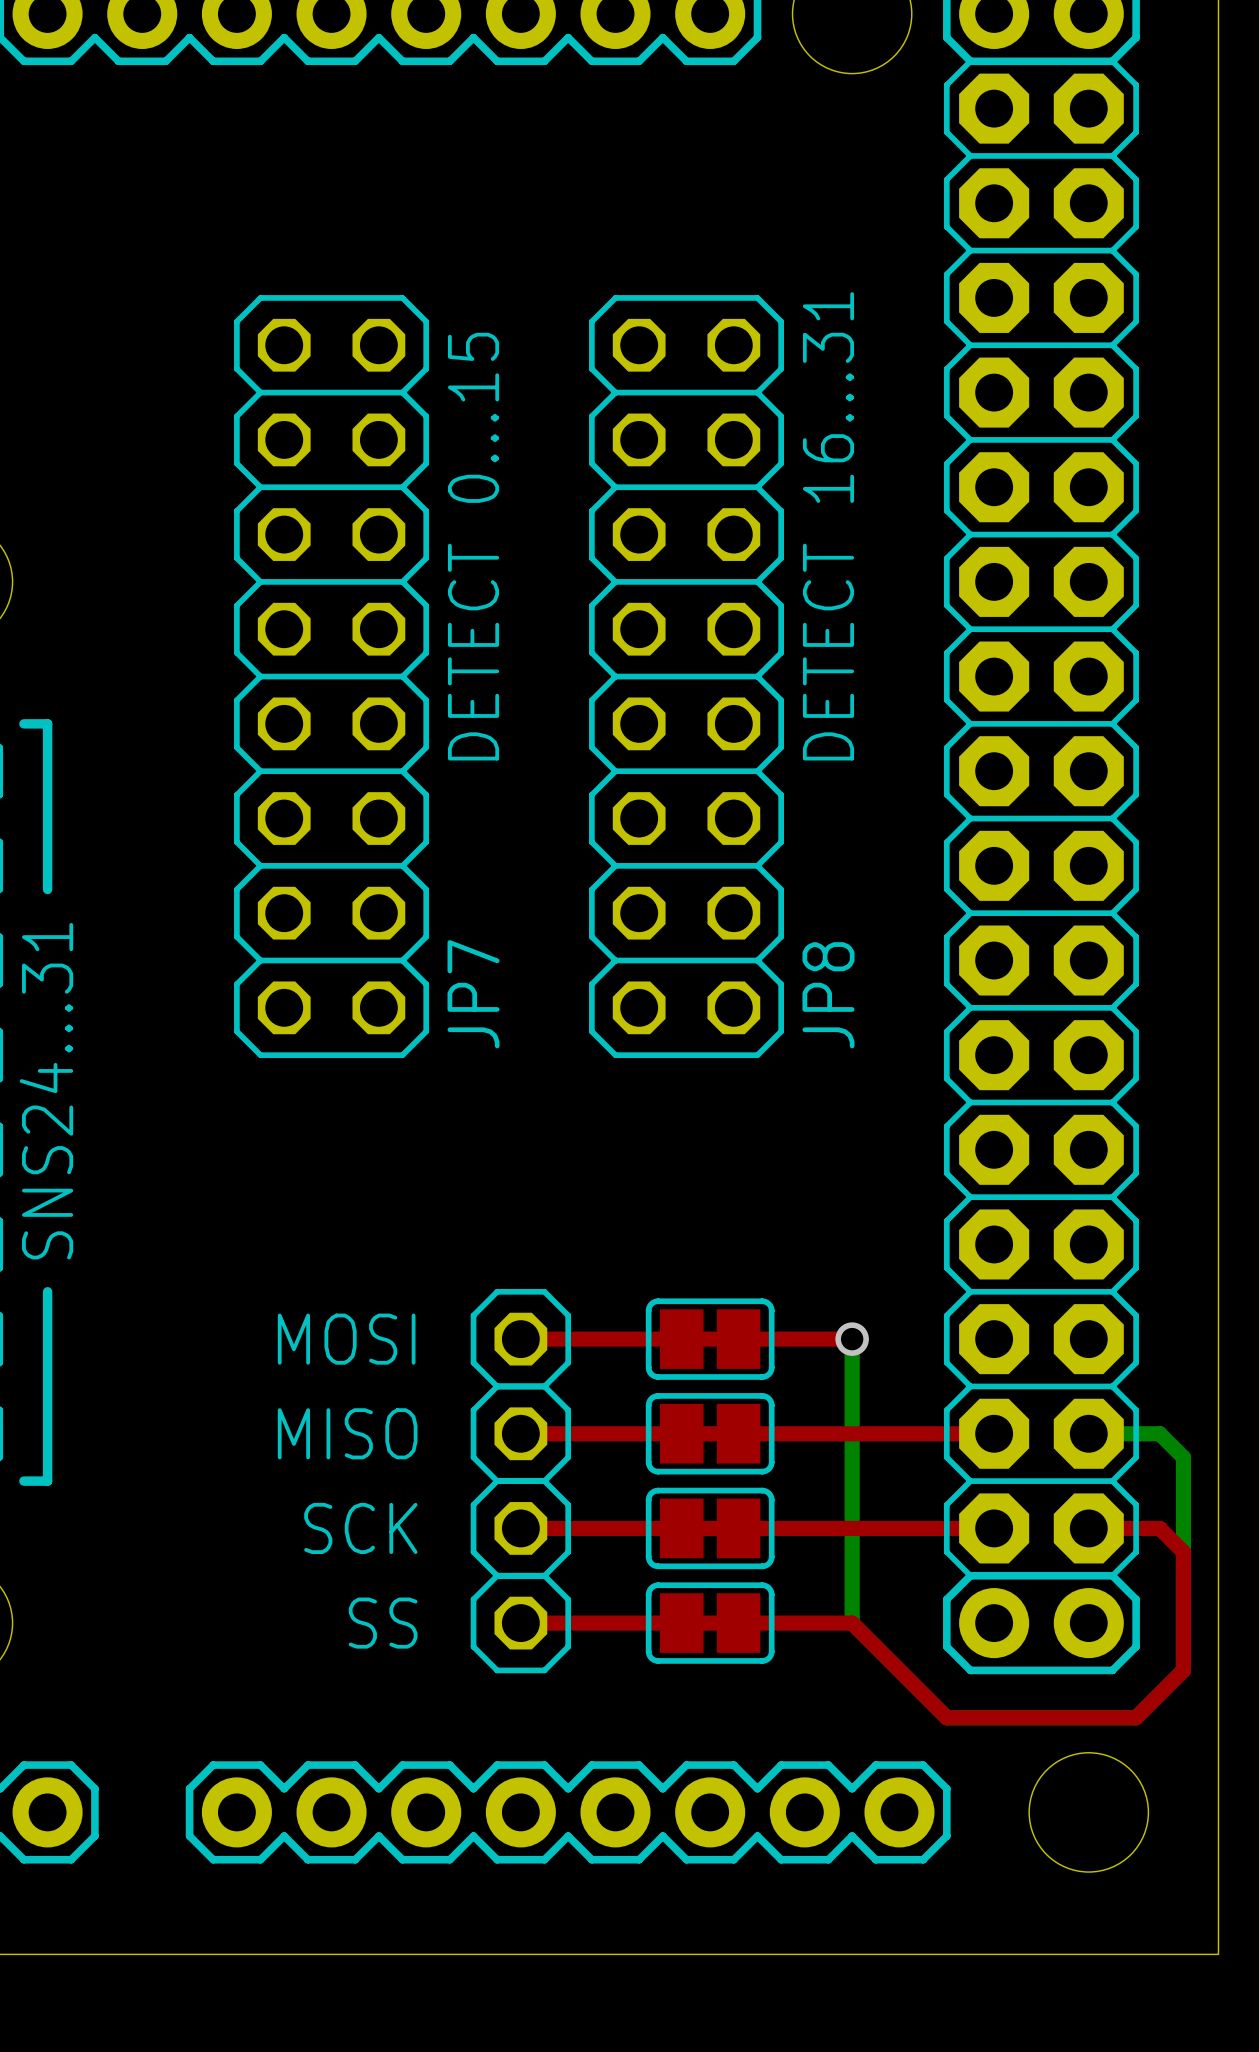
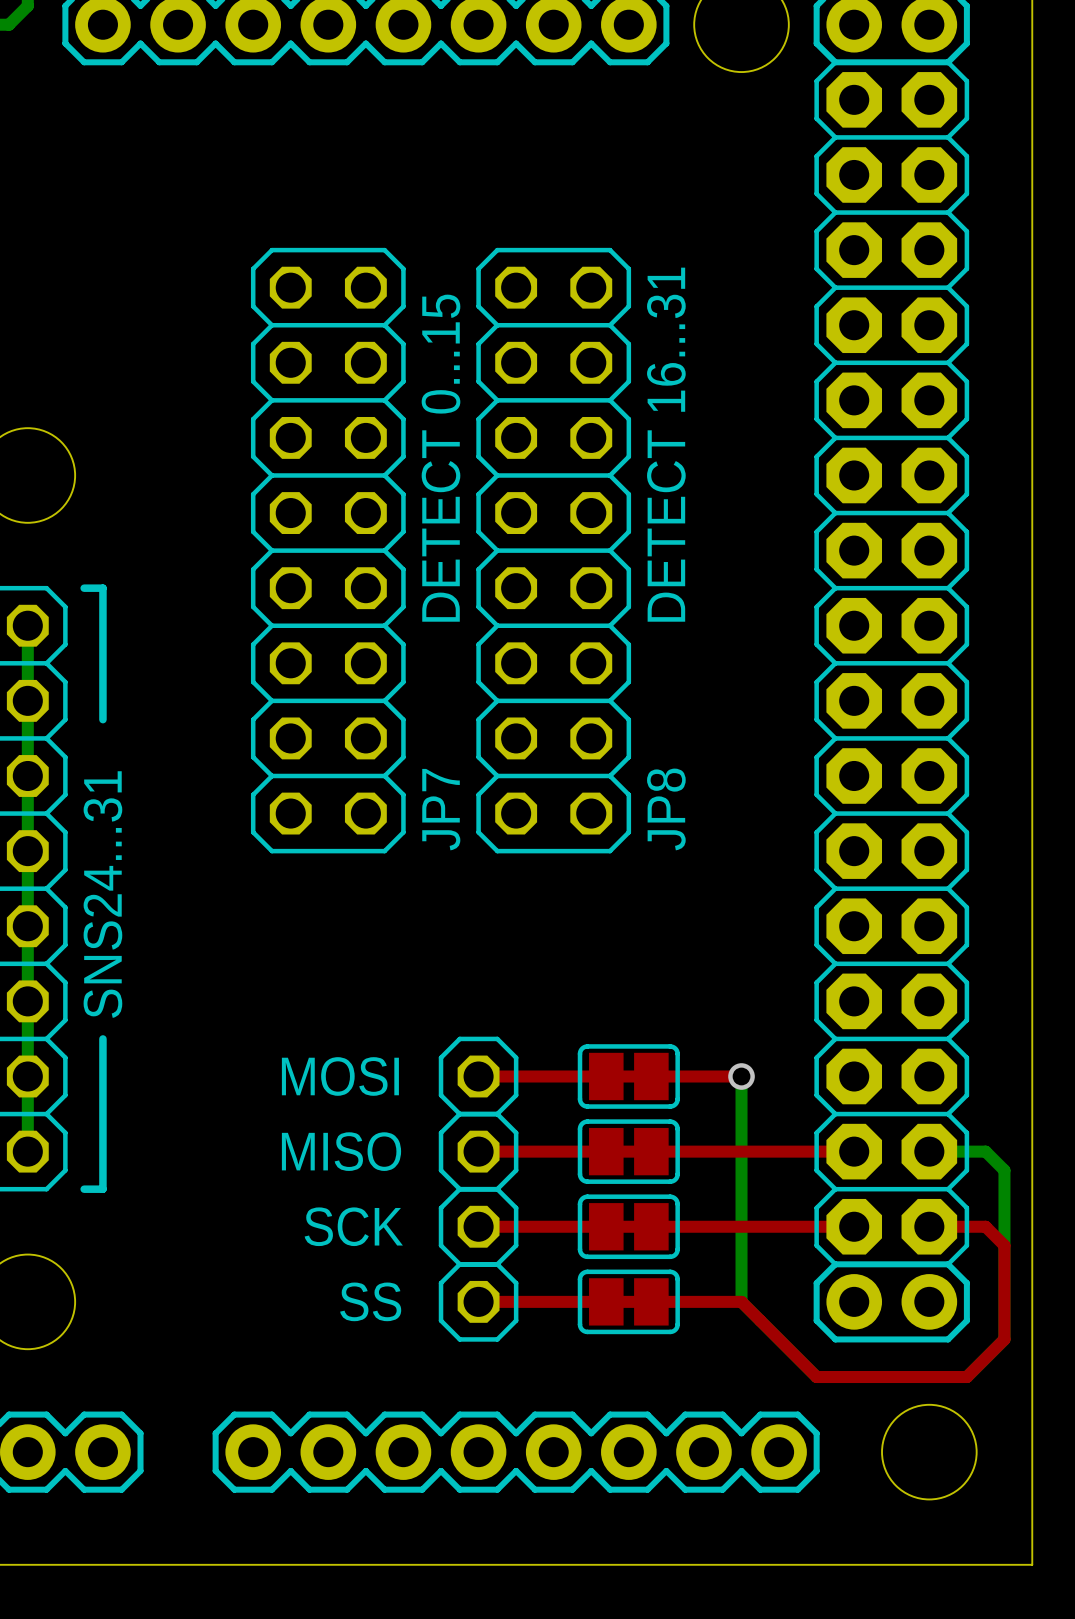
JP8 position: (686, 676) -> (553, 550)

